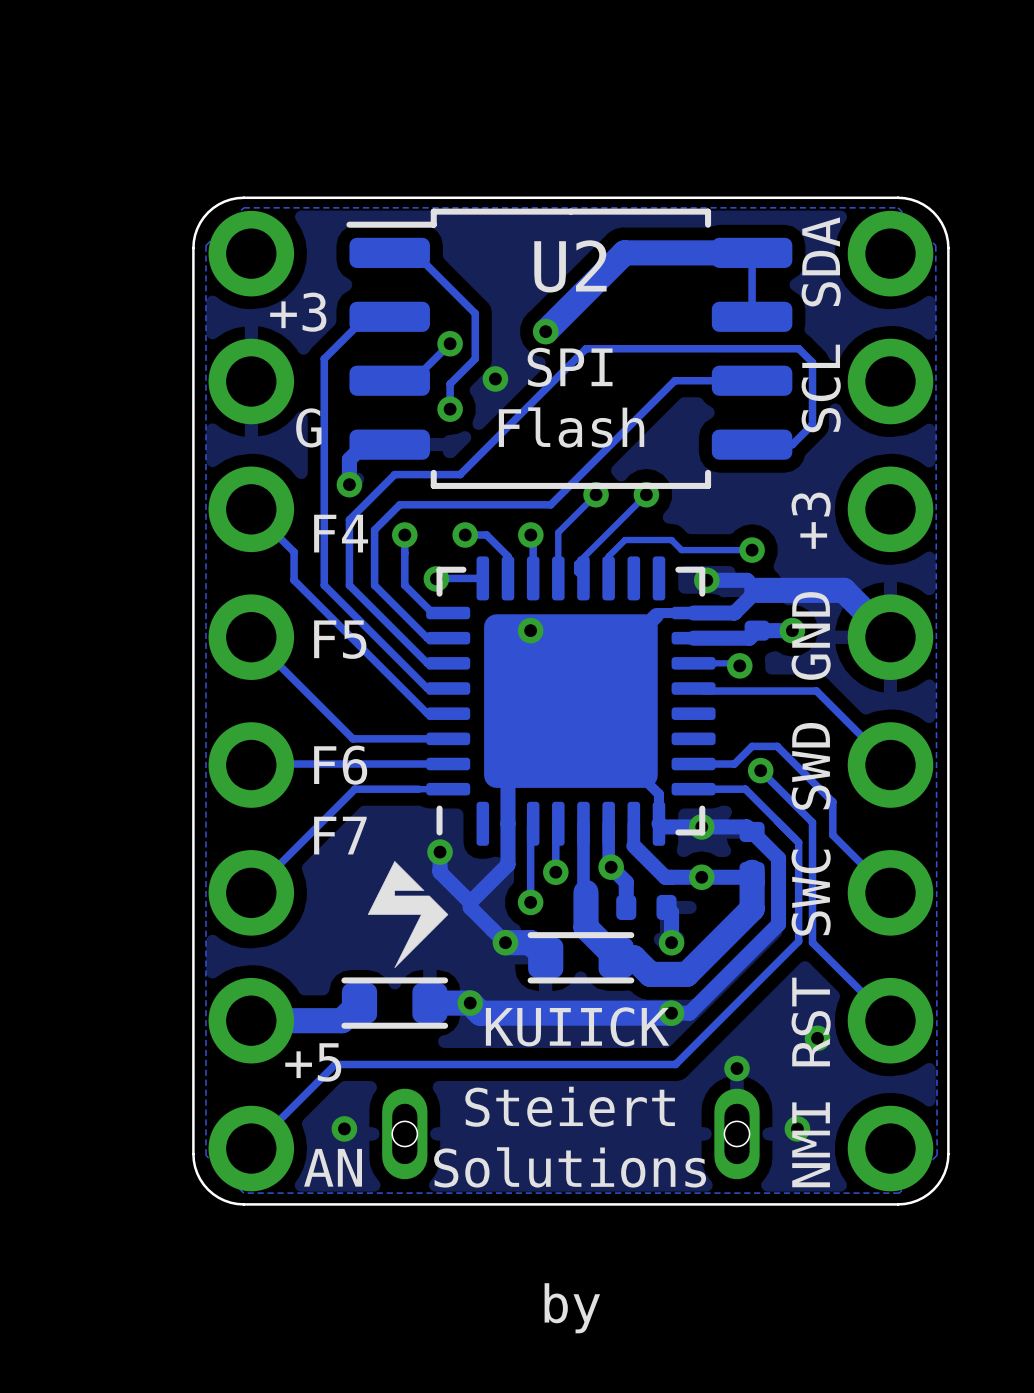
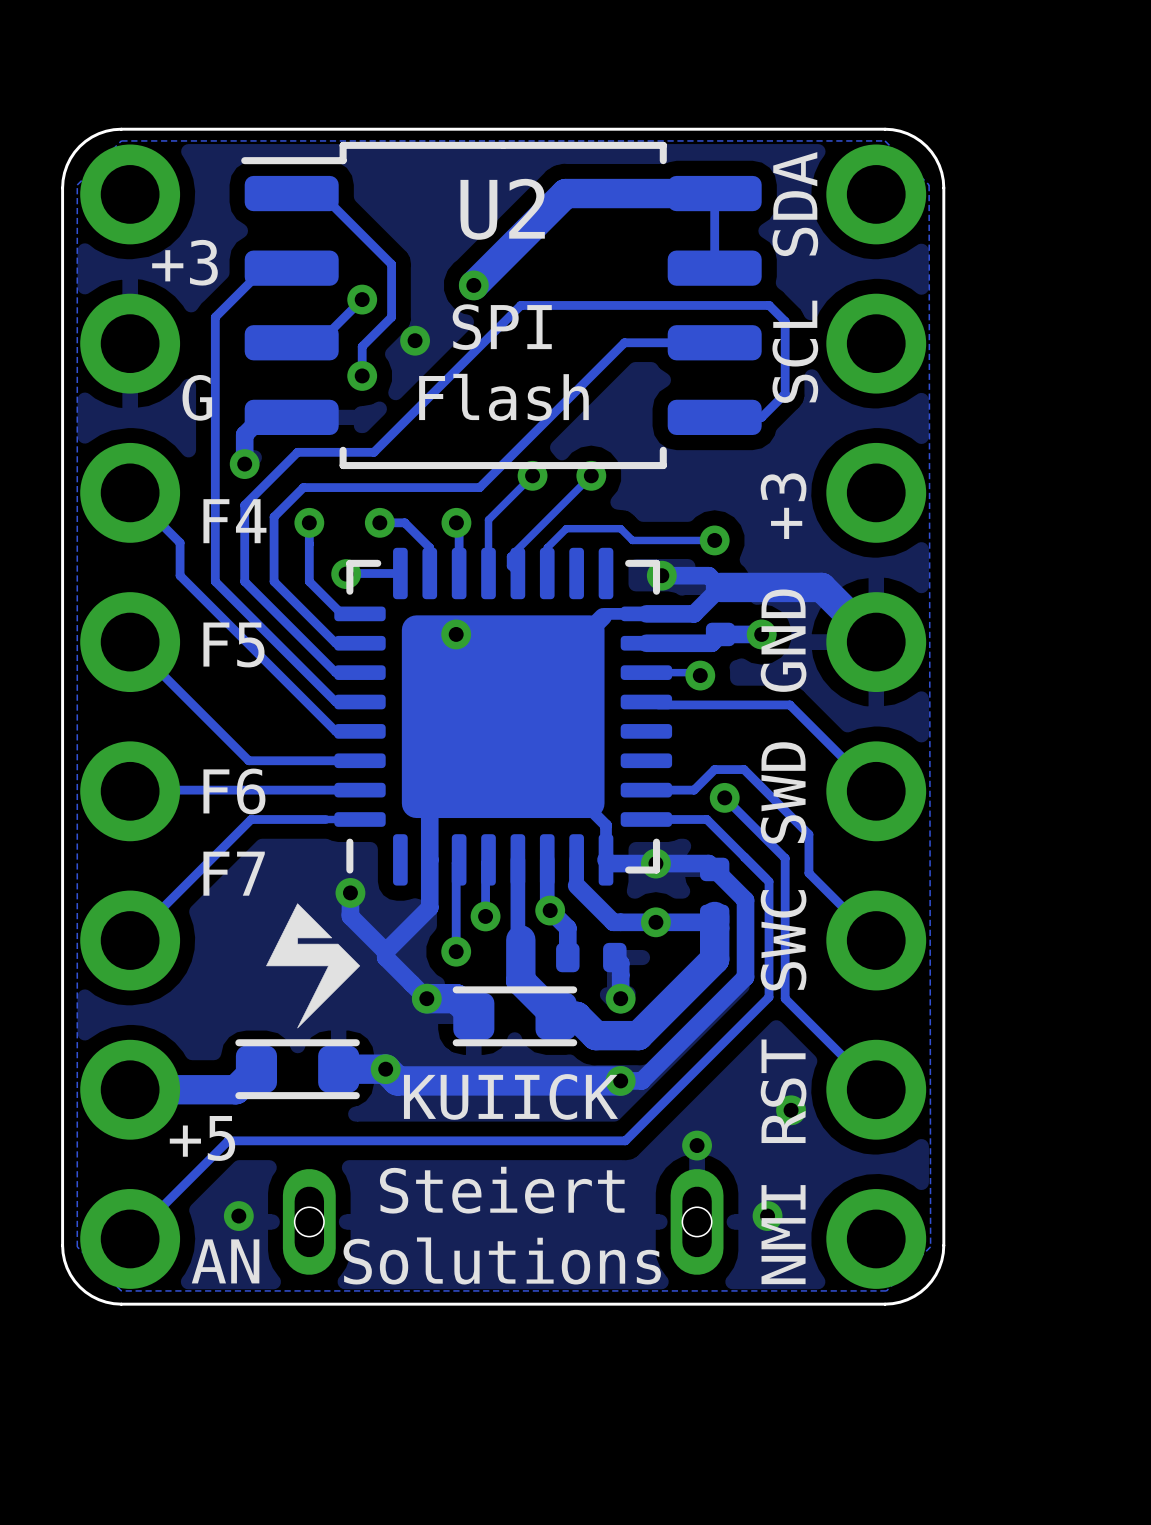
text: by (572, 1308) -> none

